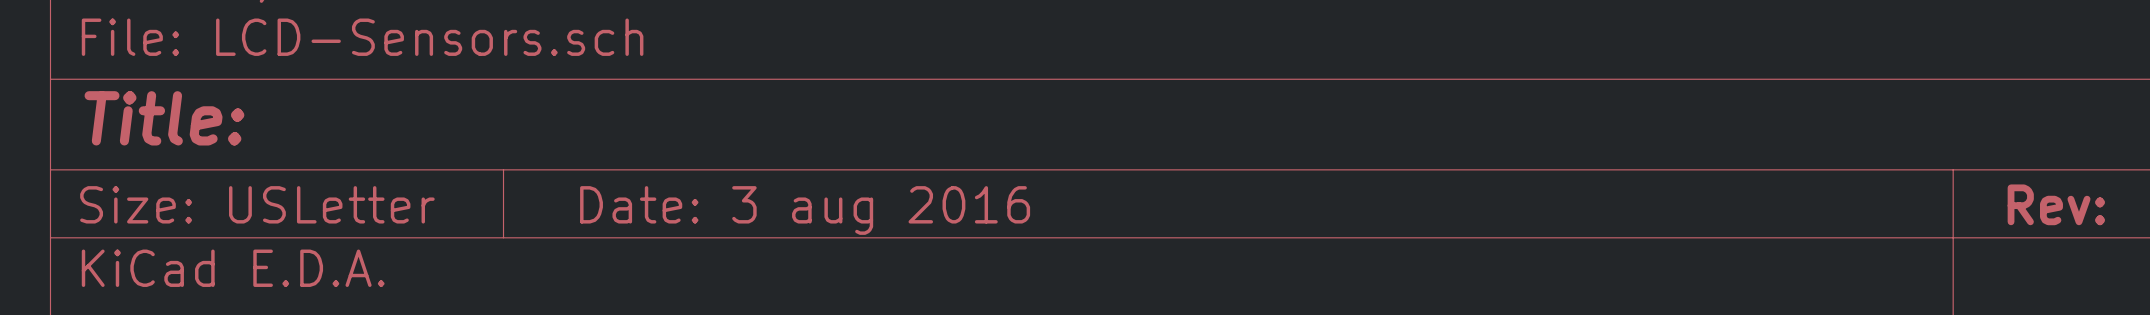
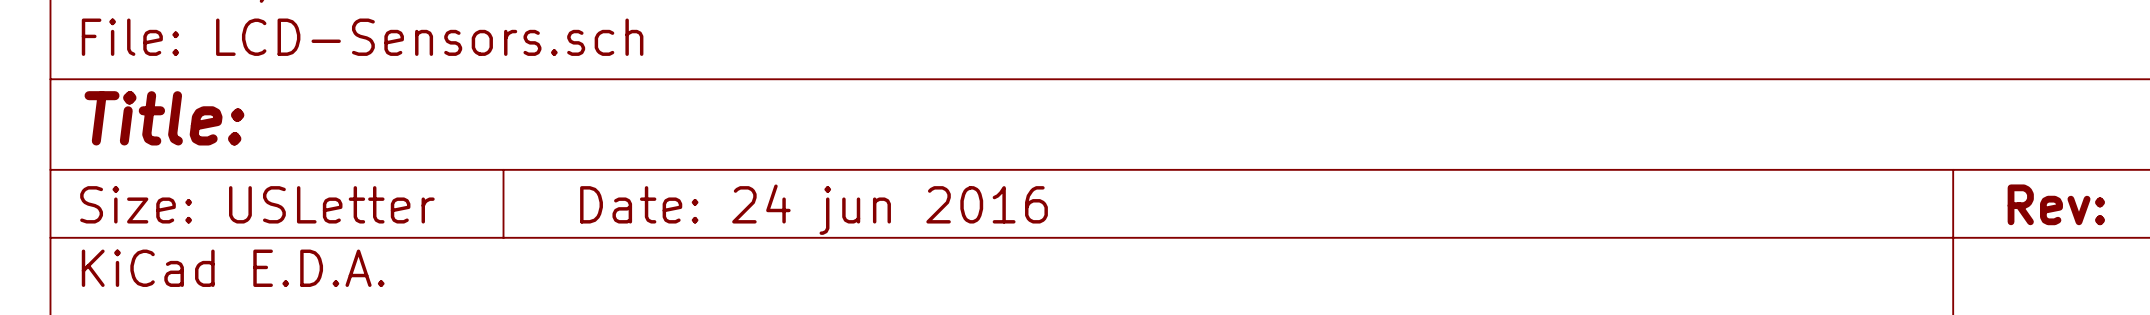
title block: Date: 3 aug 2016 (805, 210) -> Date: 24 jun 2016 (813, 209)

